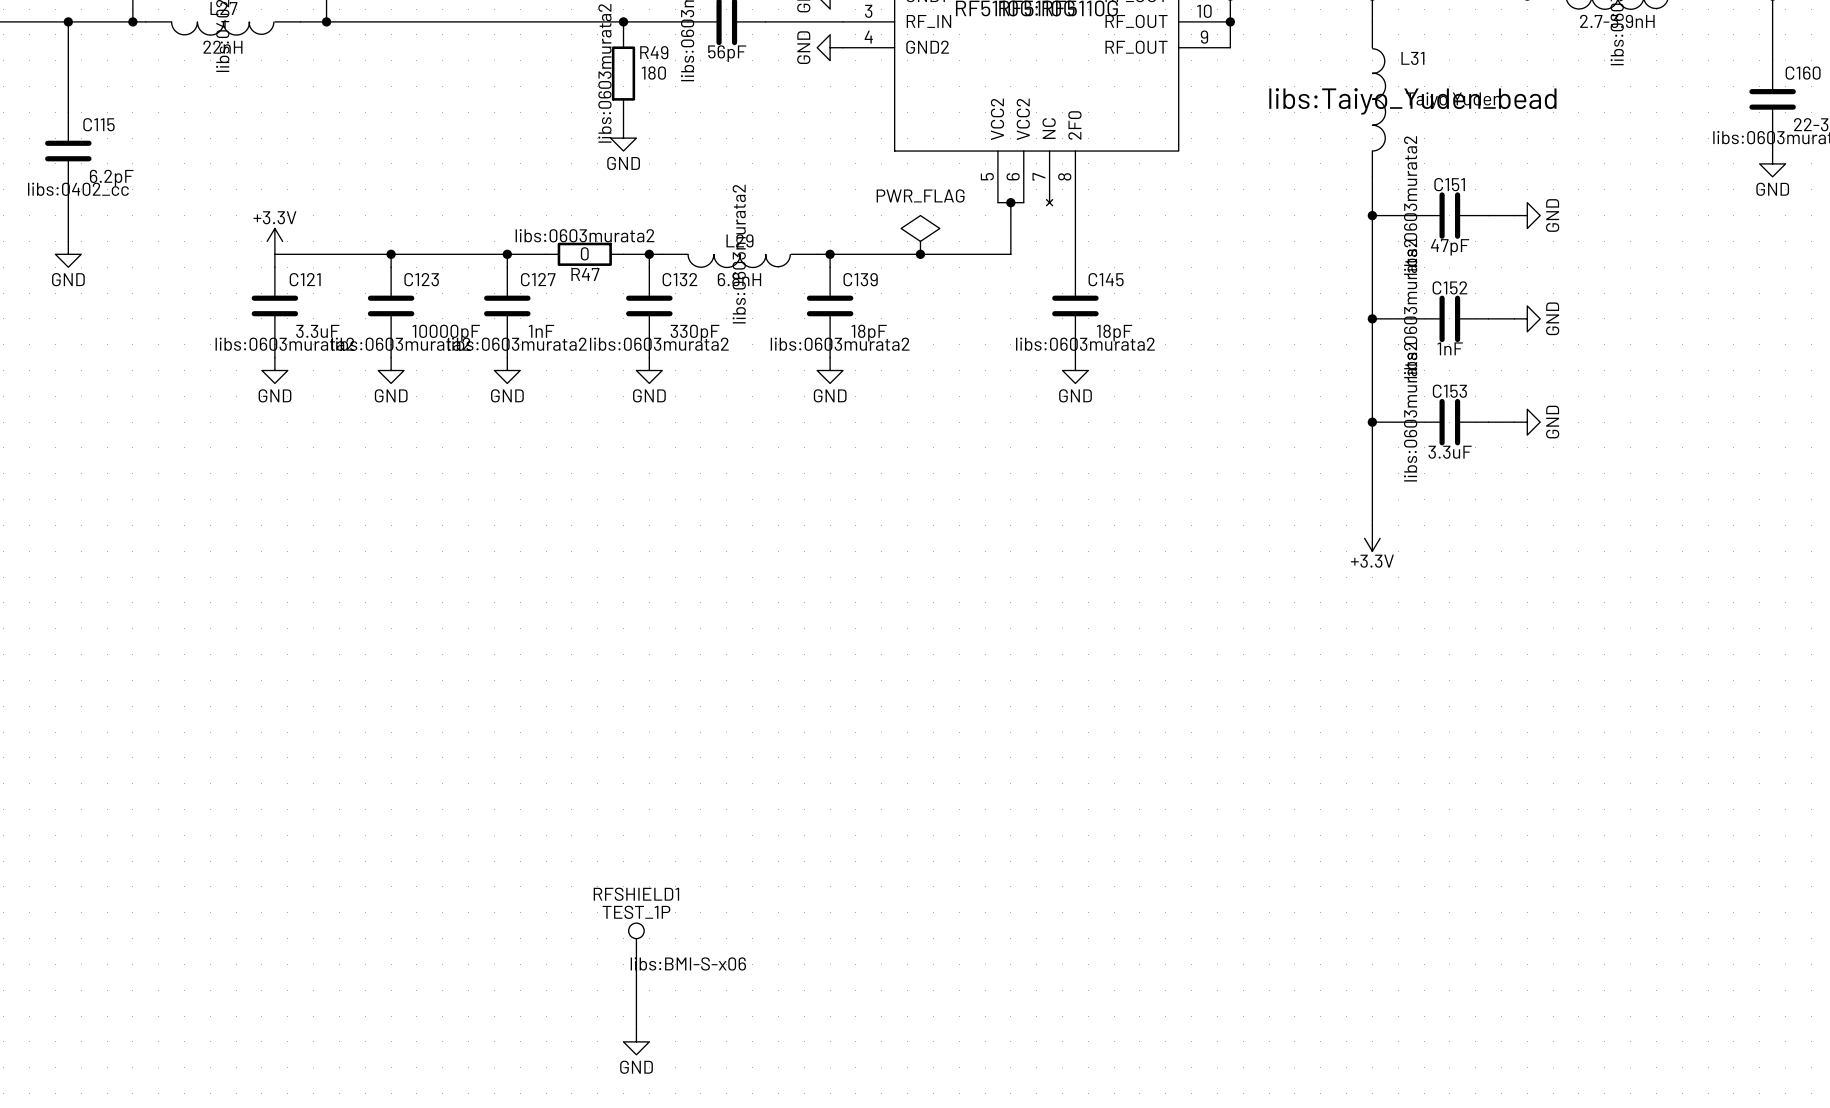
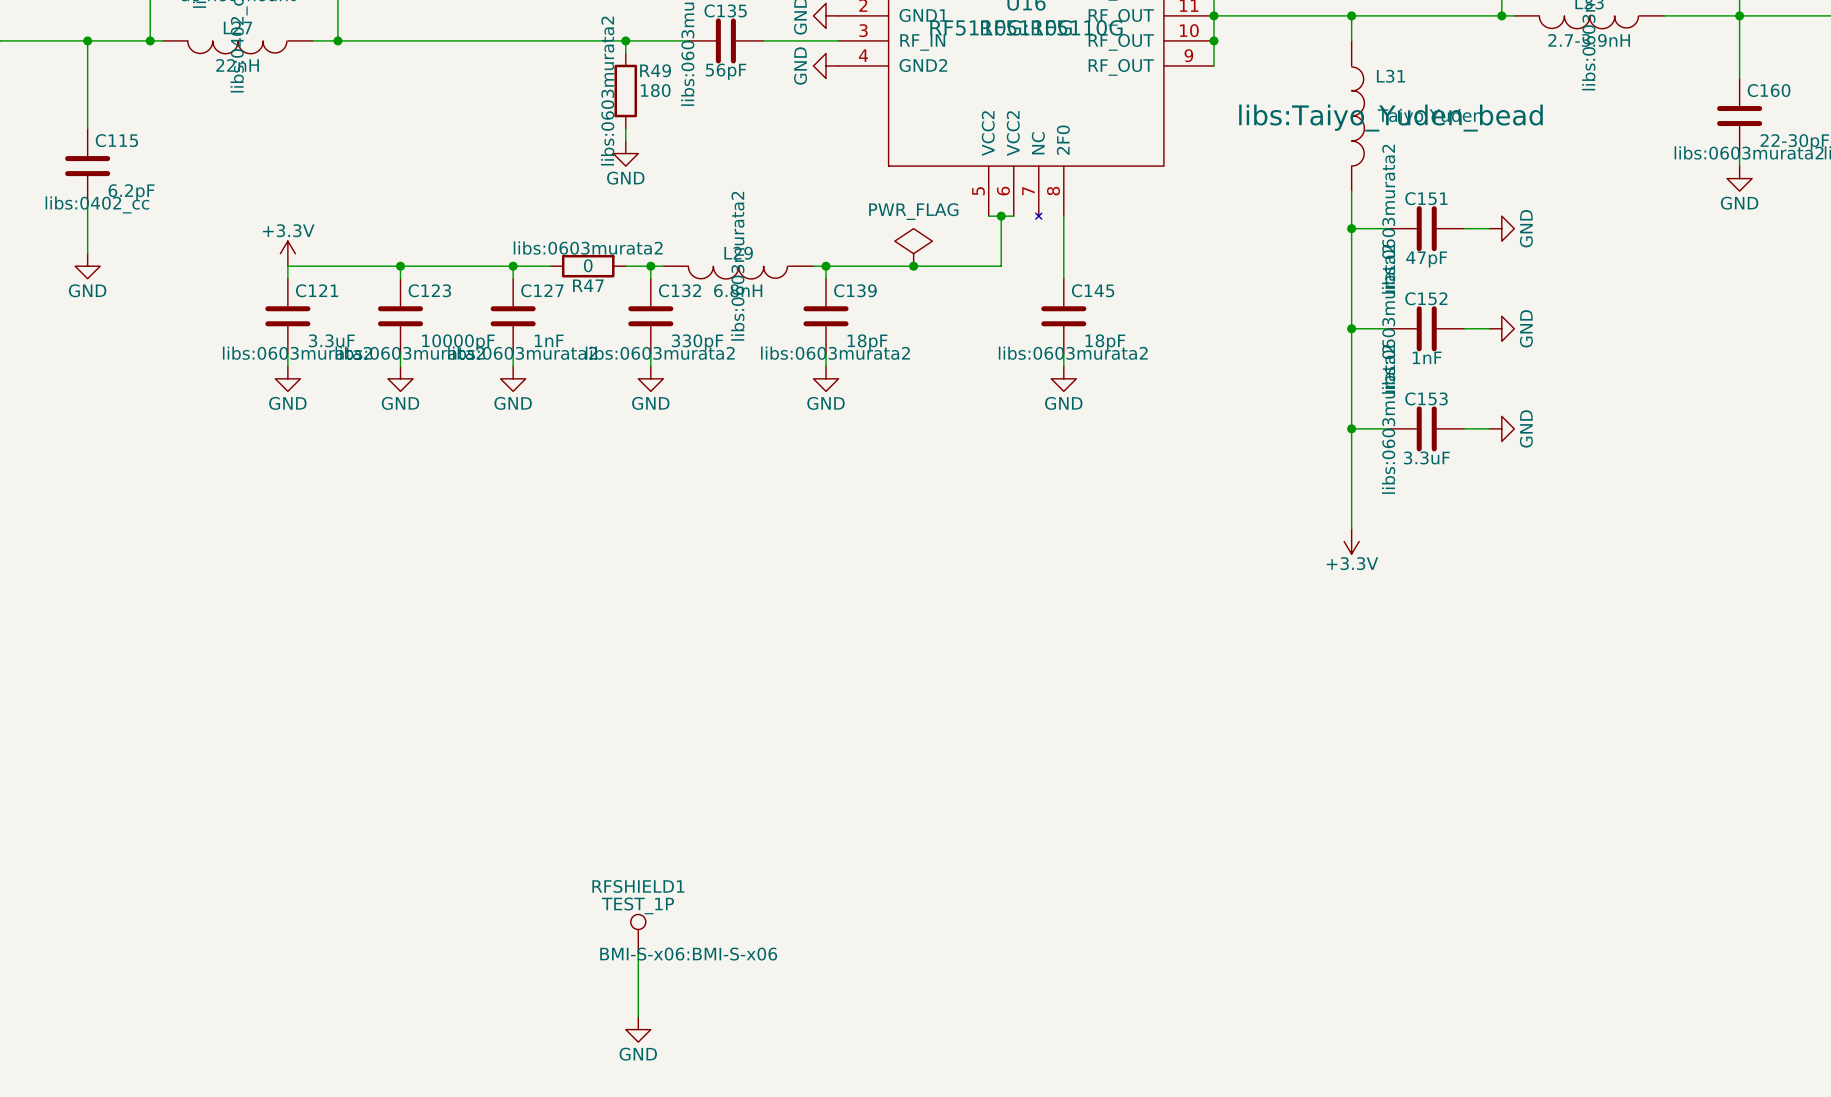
RFSHIELD1 text: libs:BMI-S-x06 (688, 963) -> BMI-S-x06:BMI-S-x06 (688, 954)

